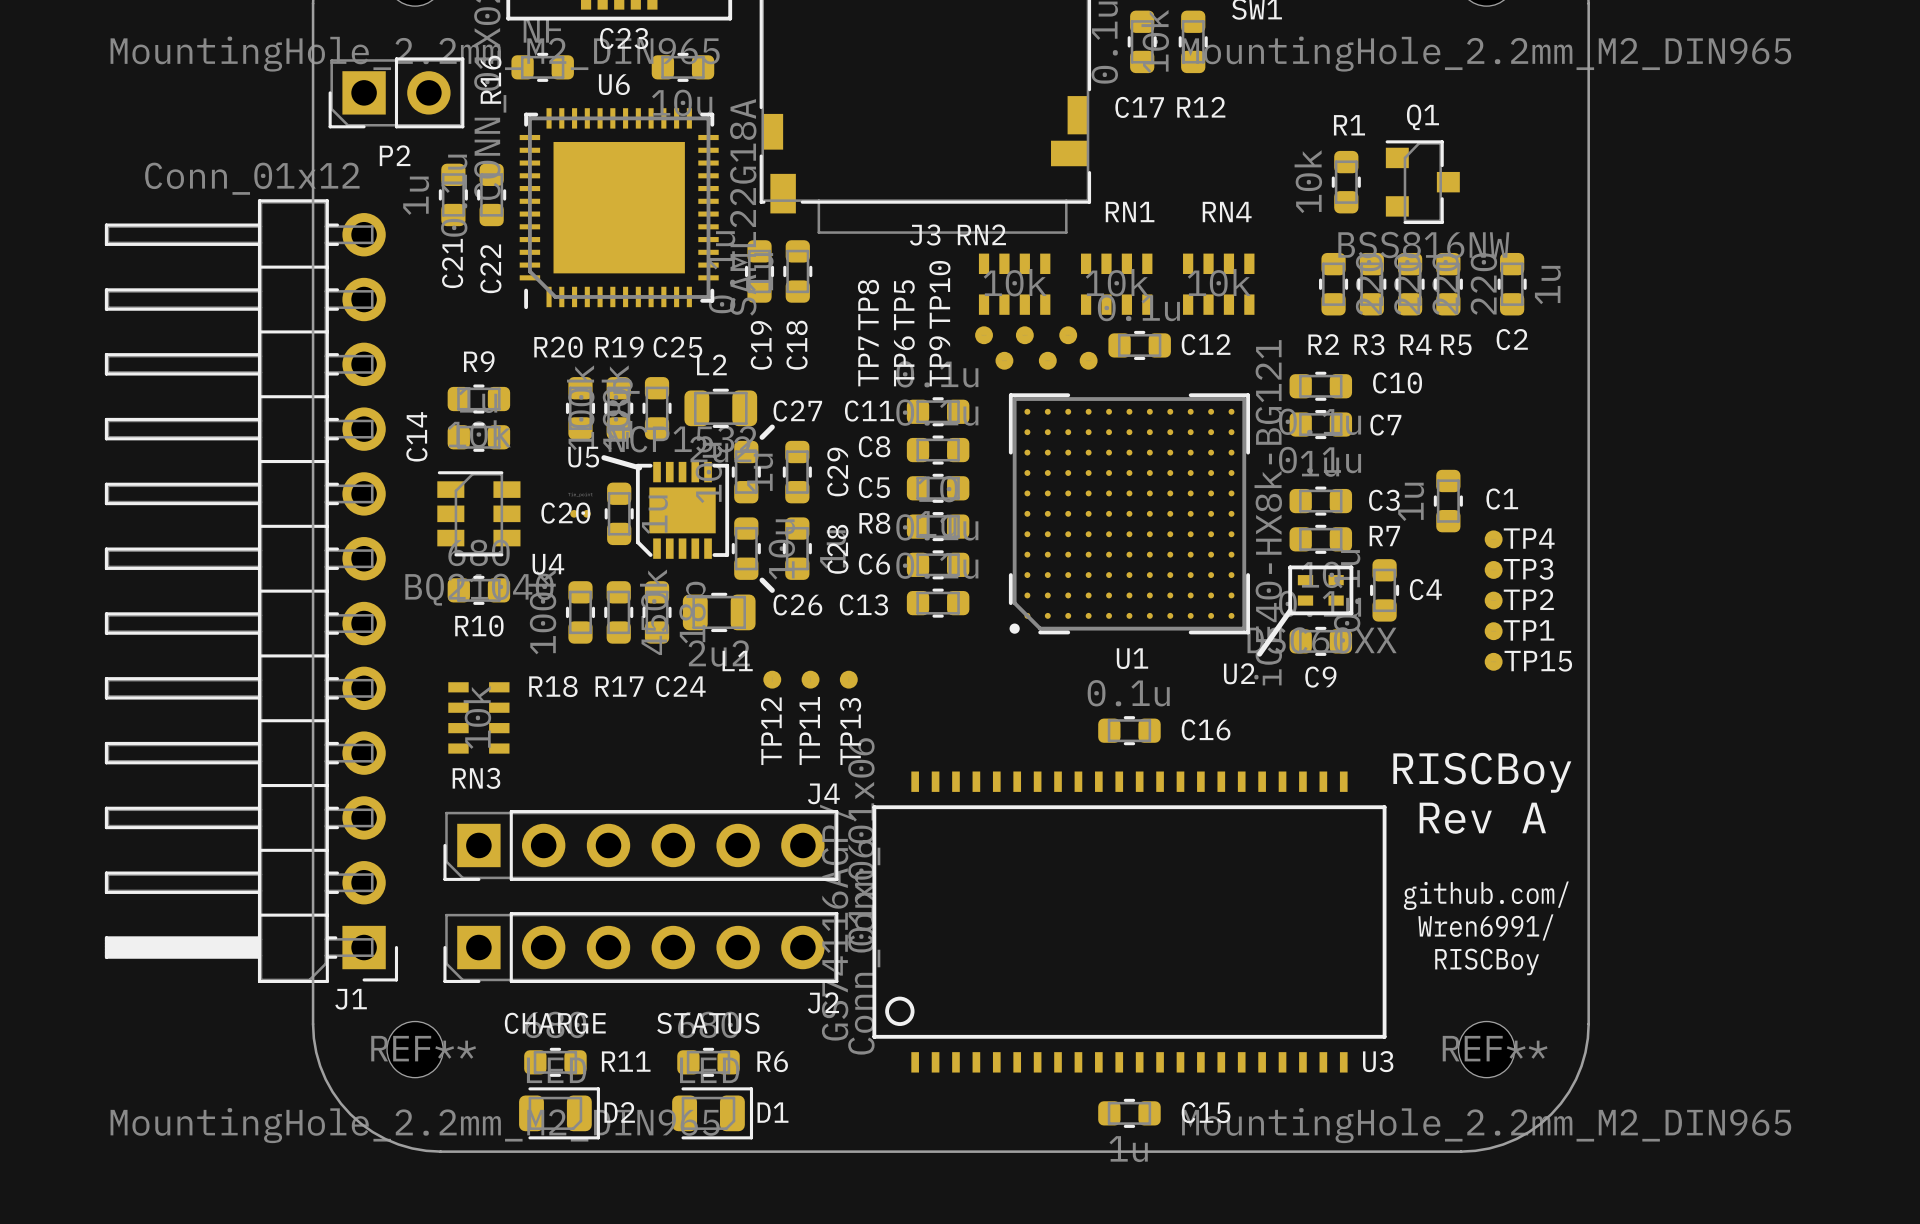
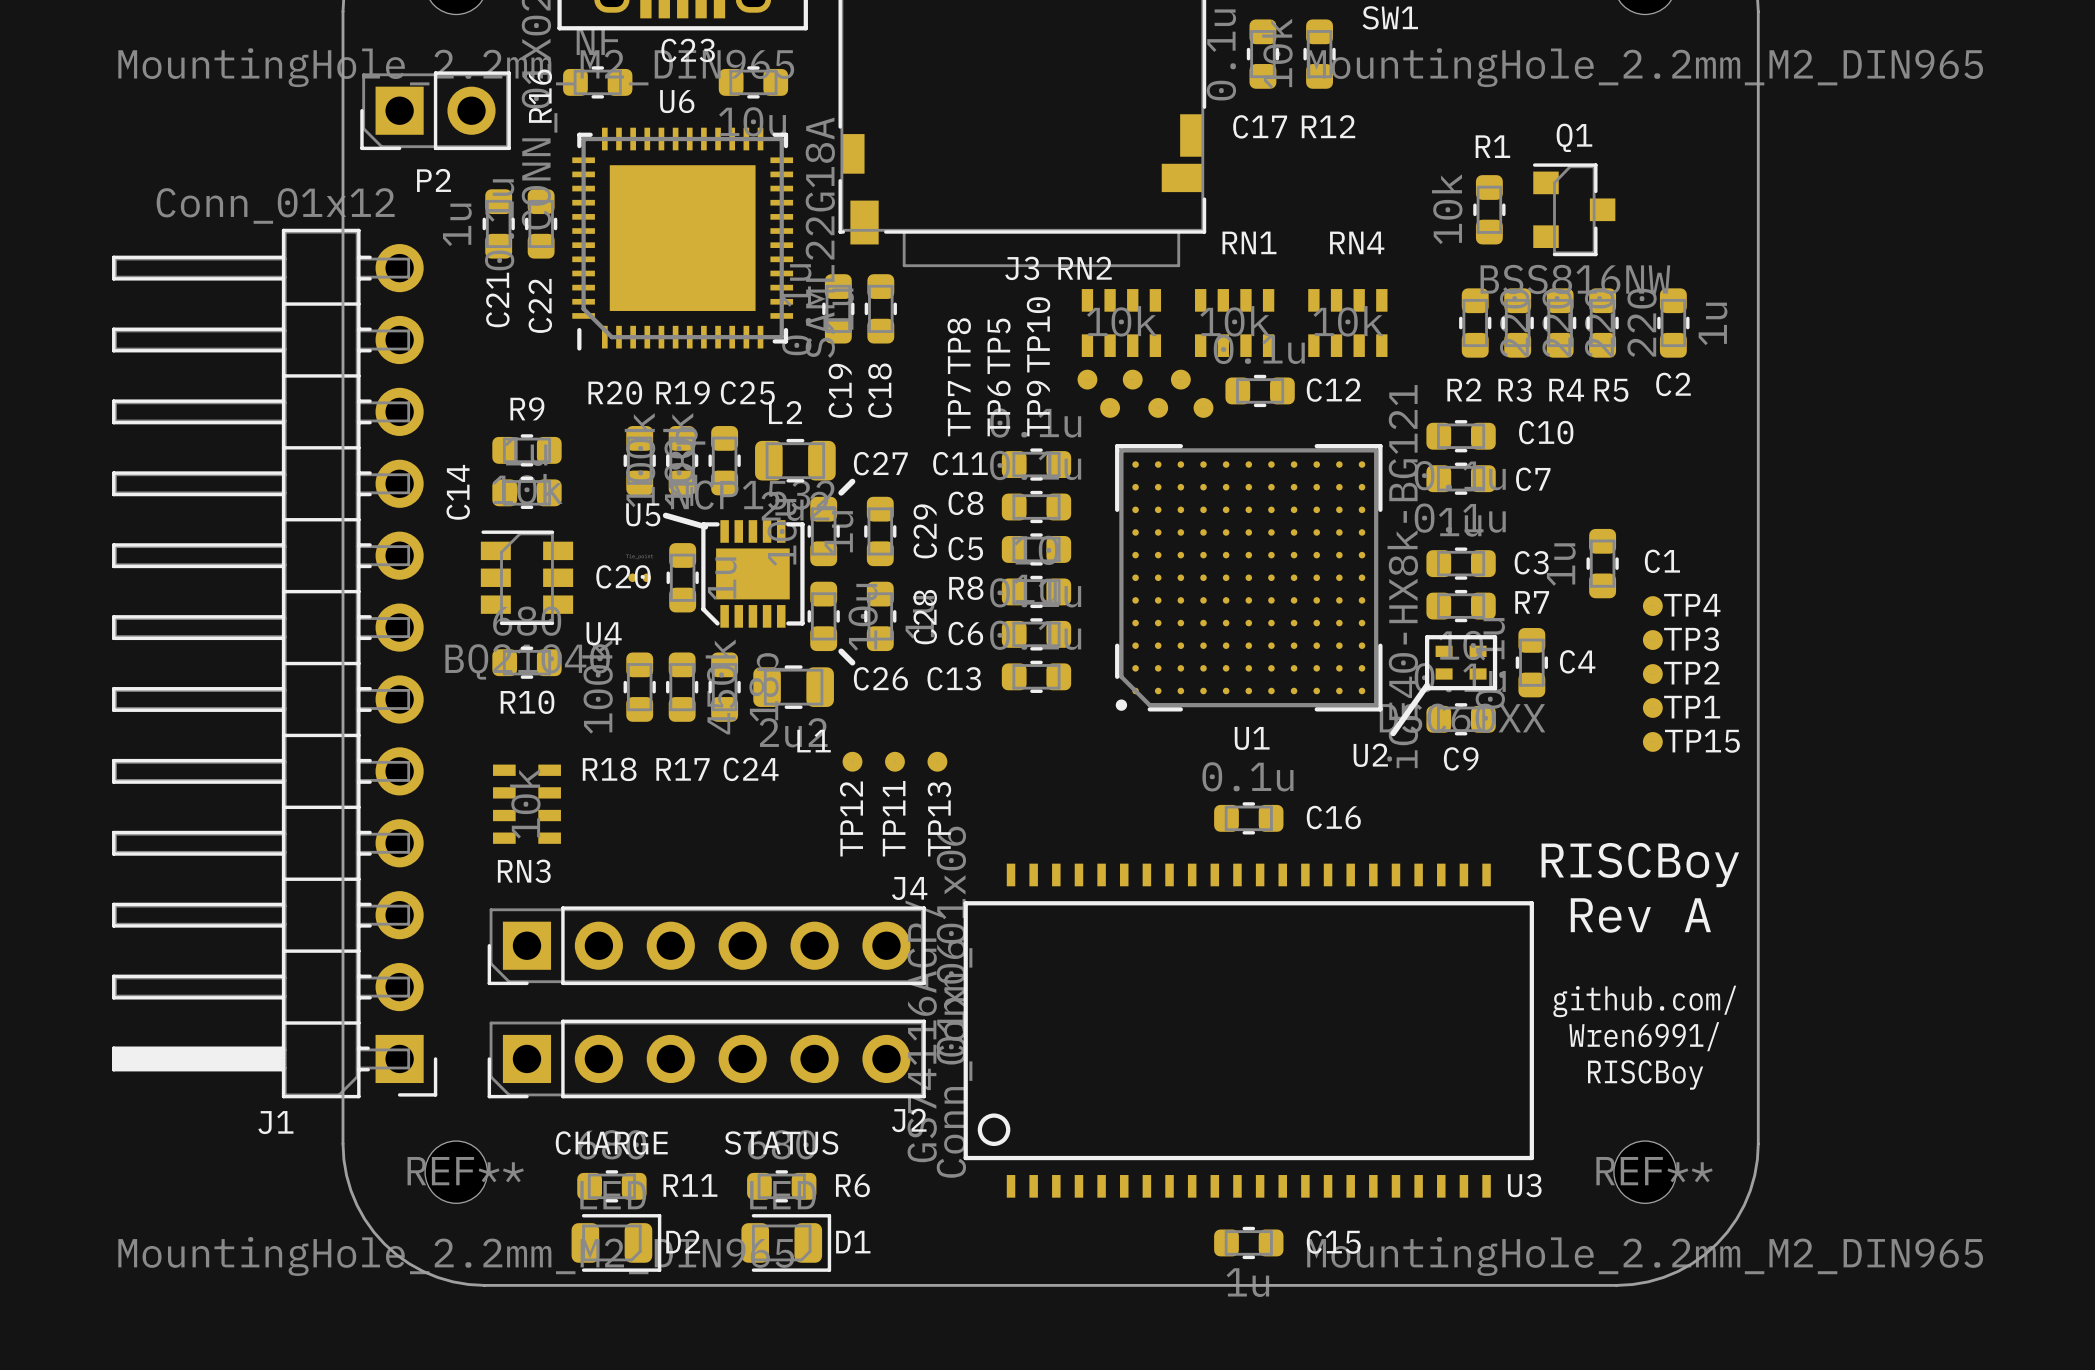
J1 name position: J1 (351, 999) -> J1 (275, 1122)

